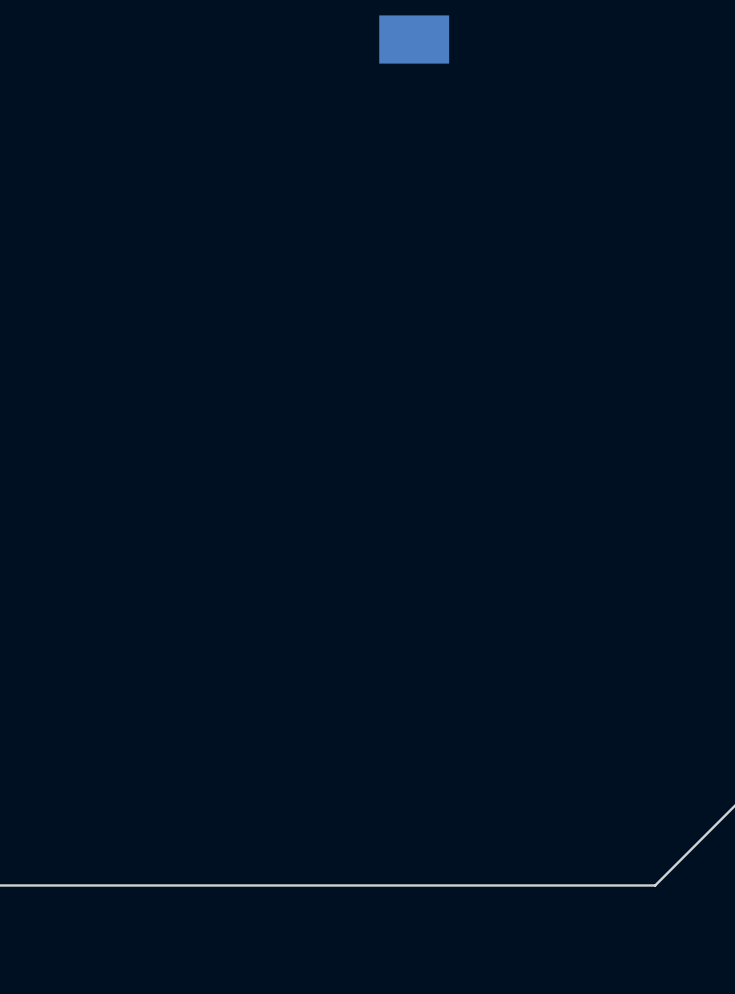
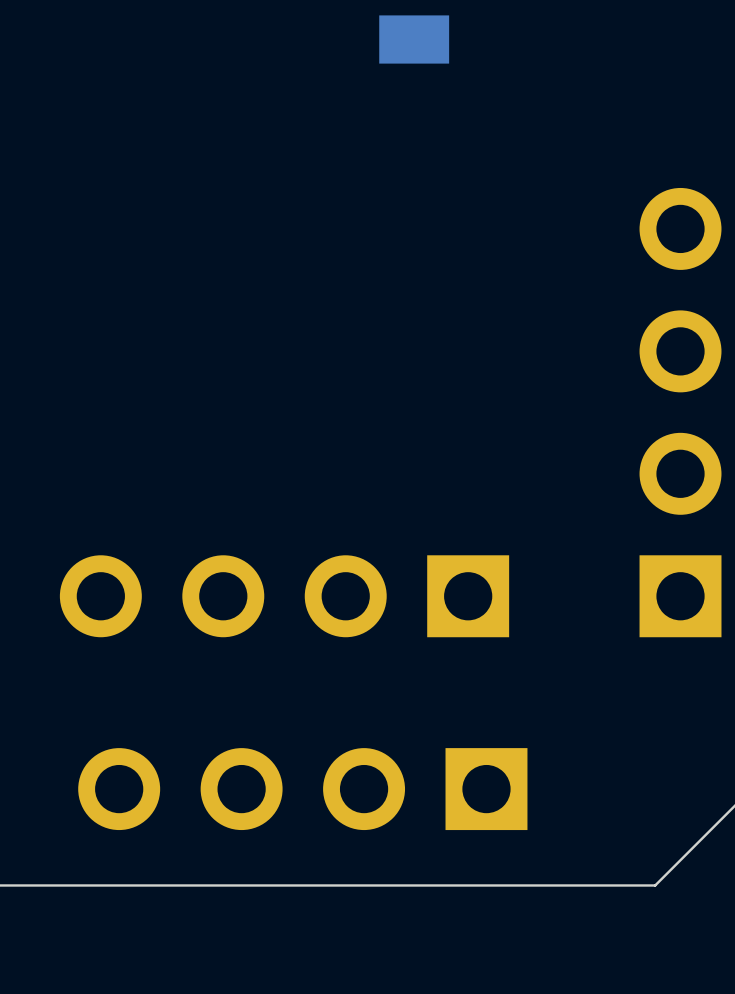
part: none -> (680, 412)
part: none -> (284, 596)
part: none -> (302, 789)

